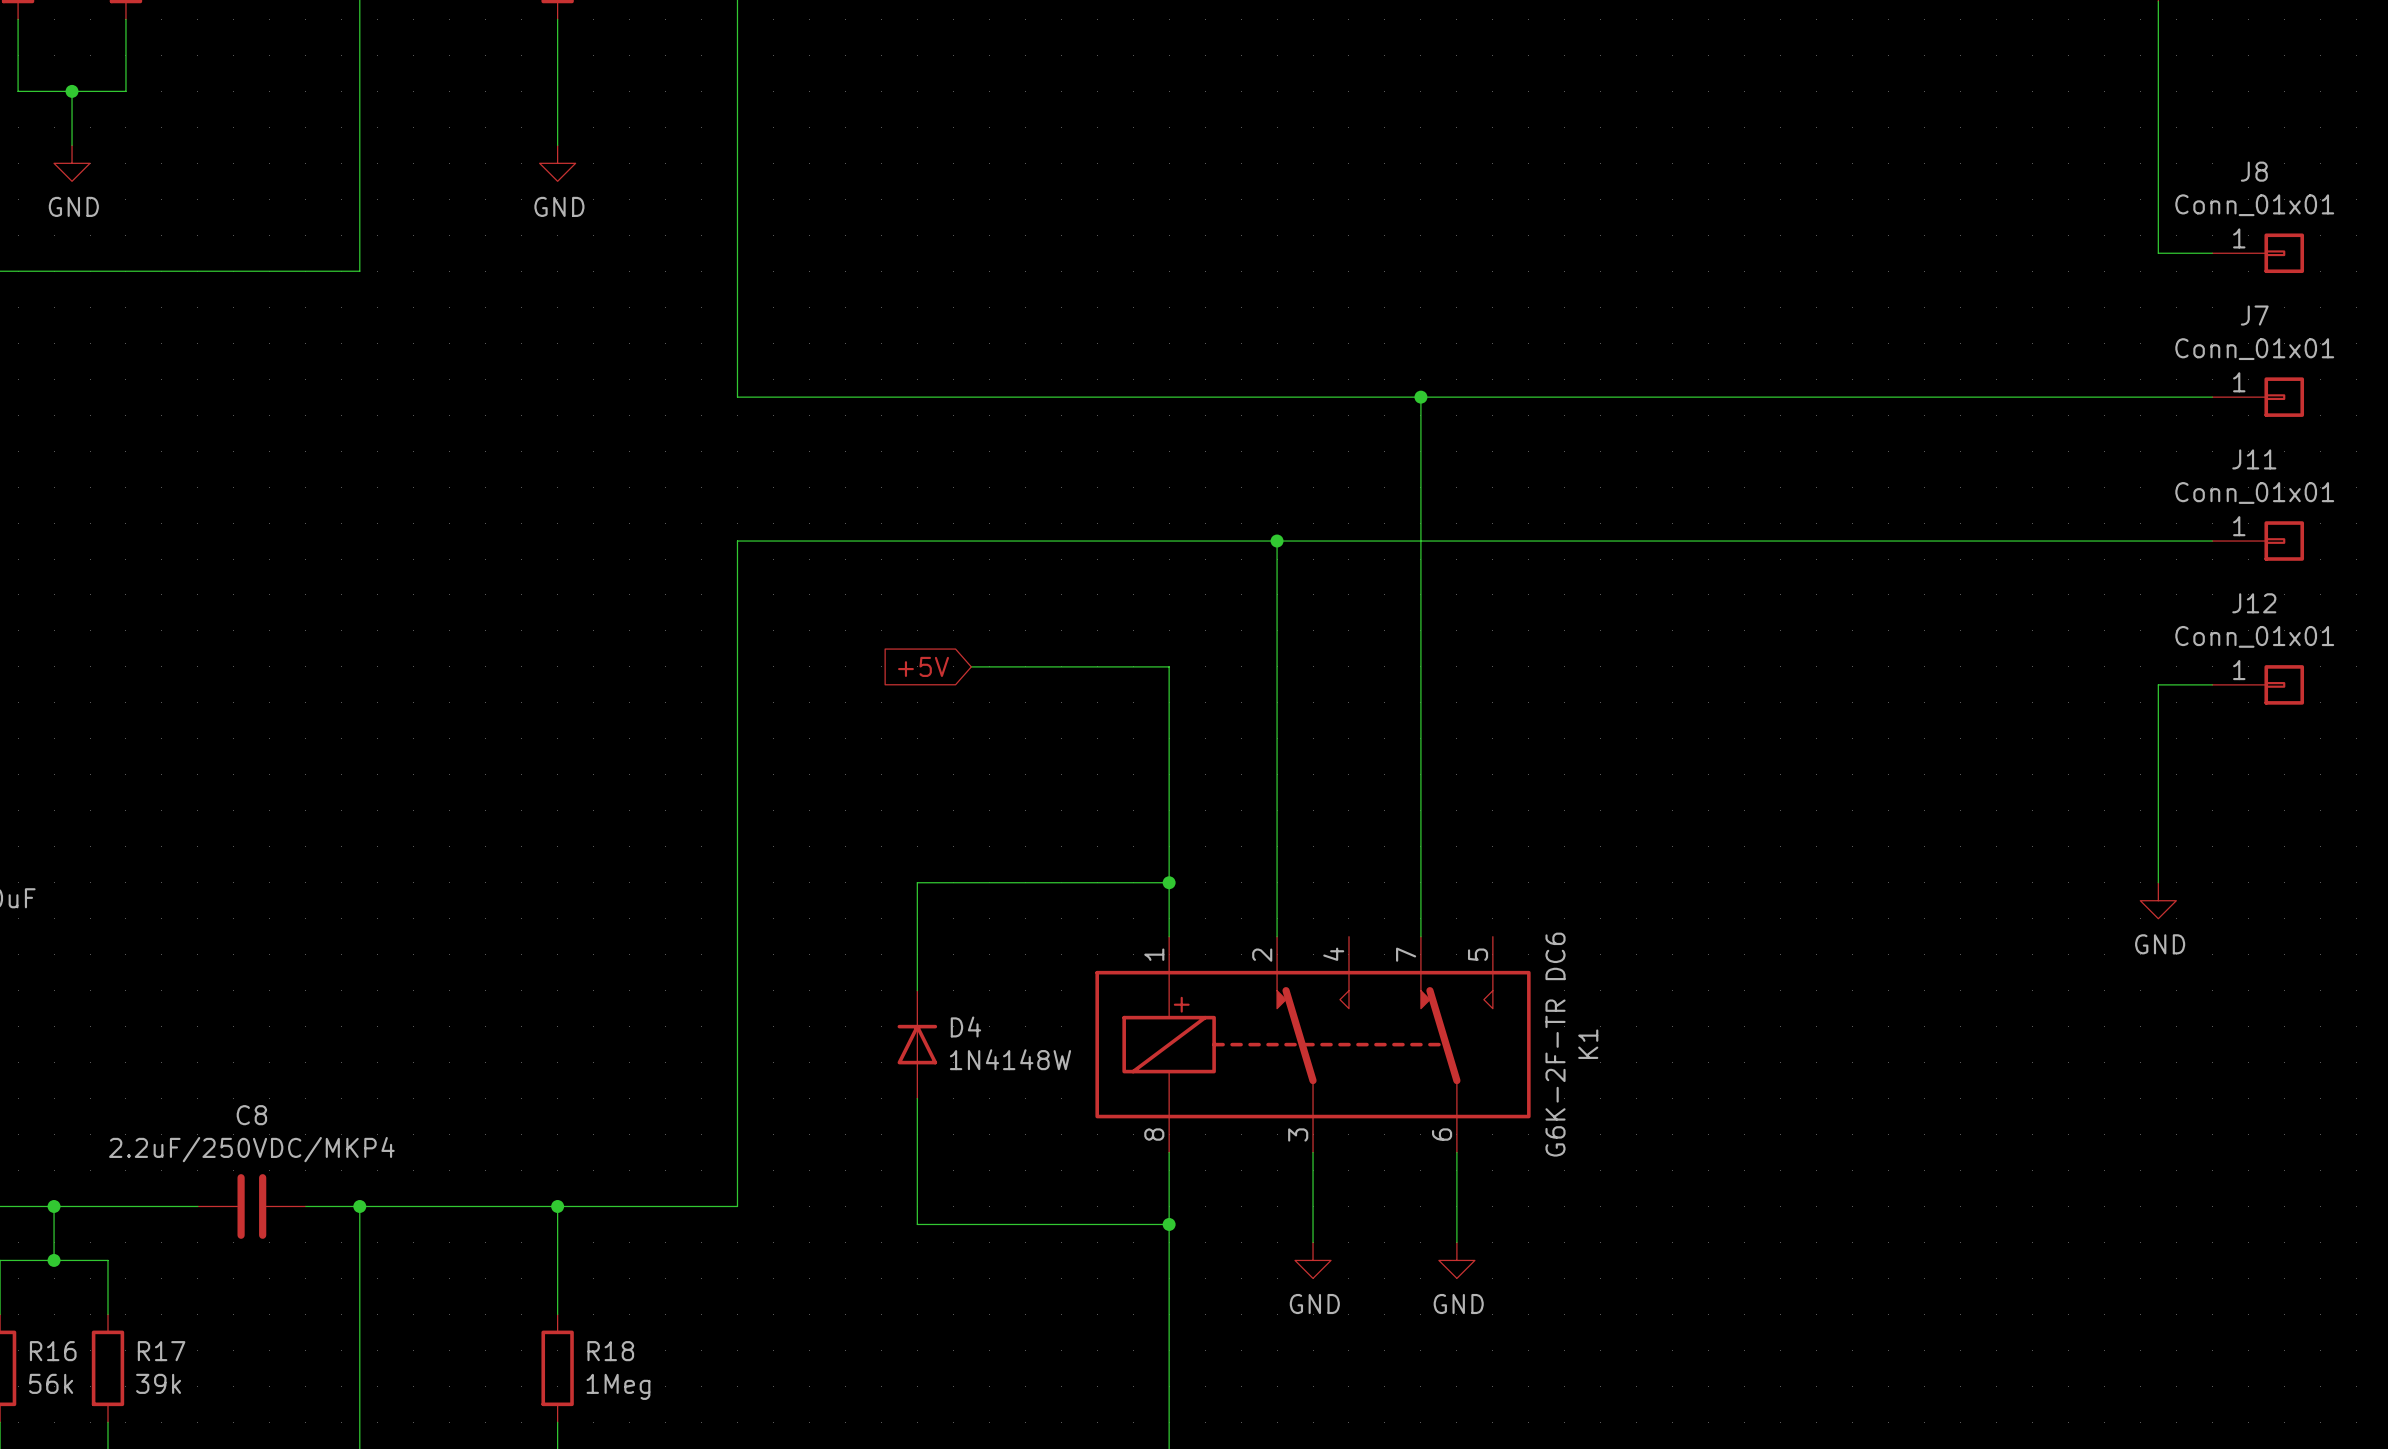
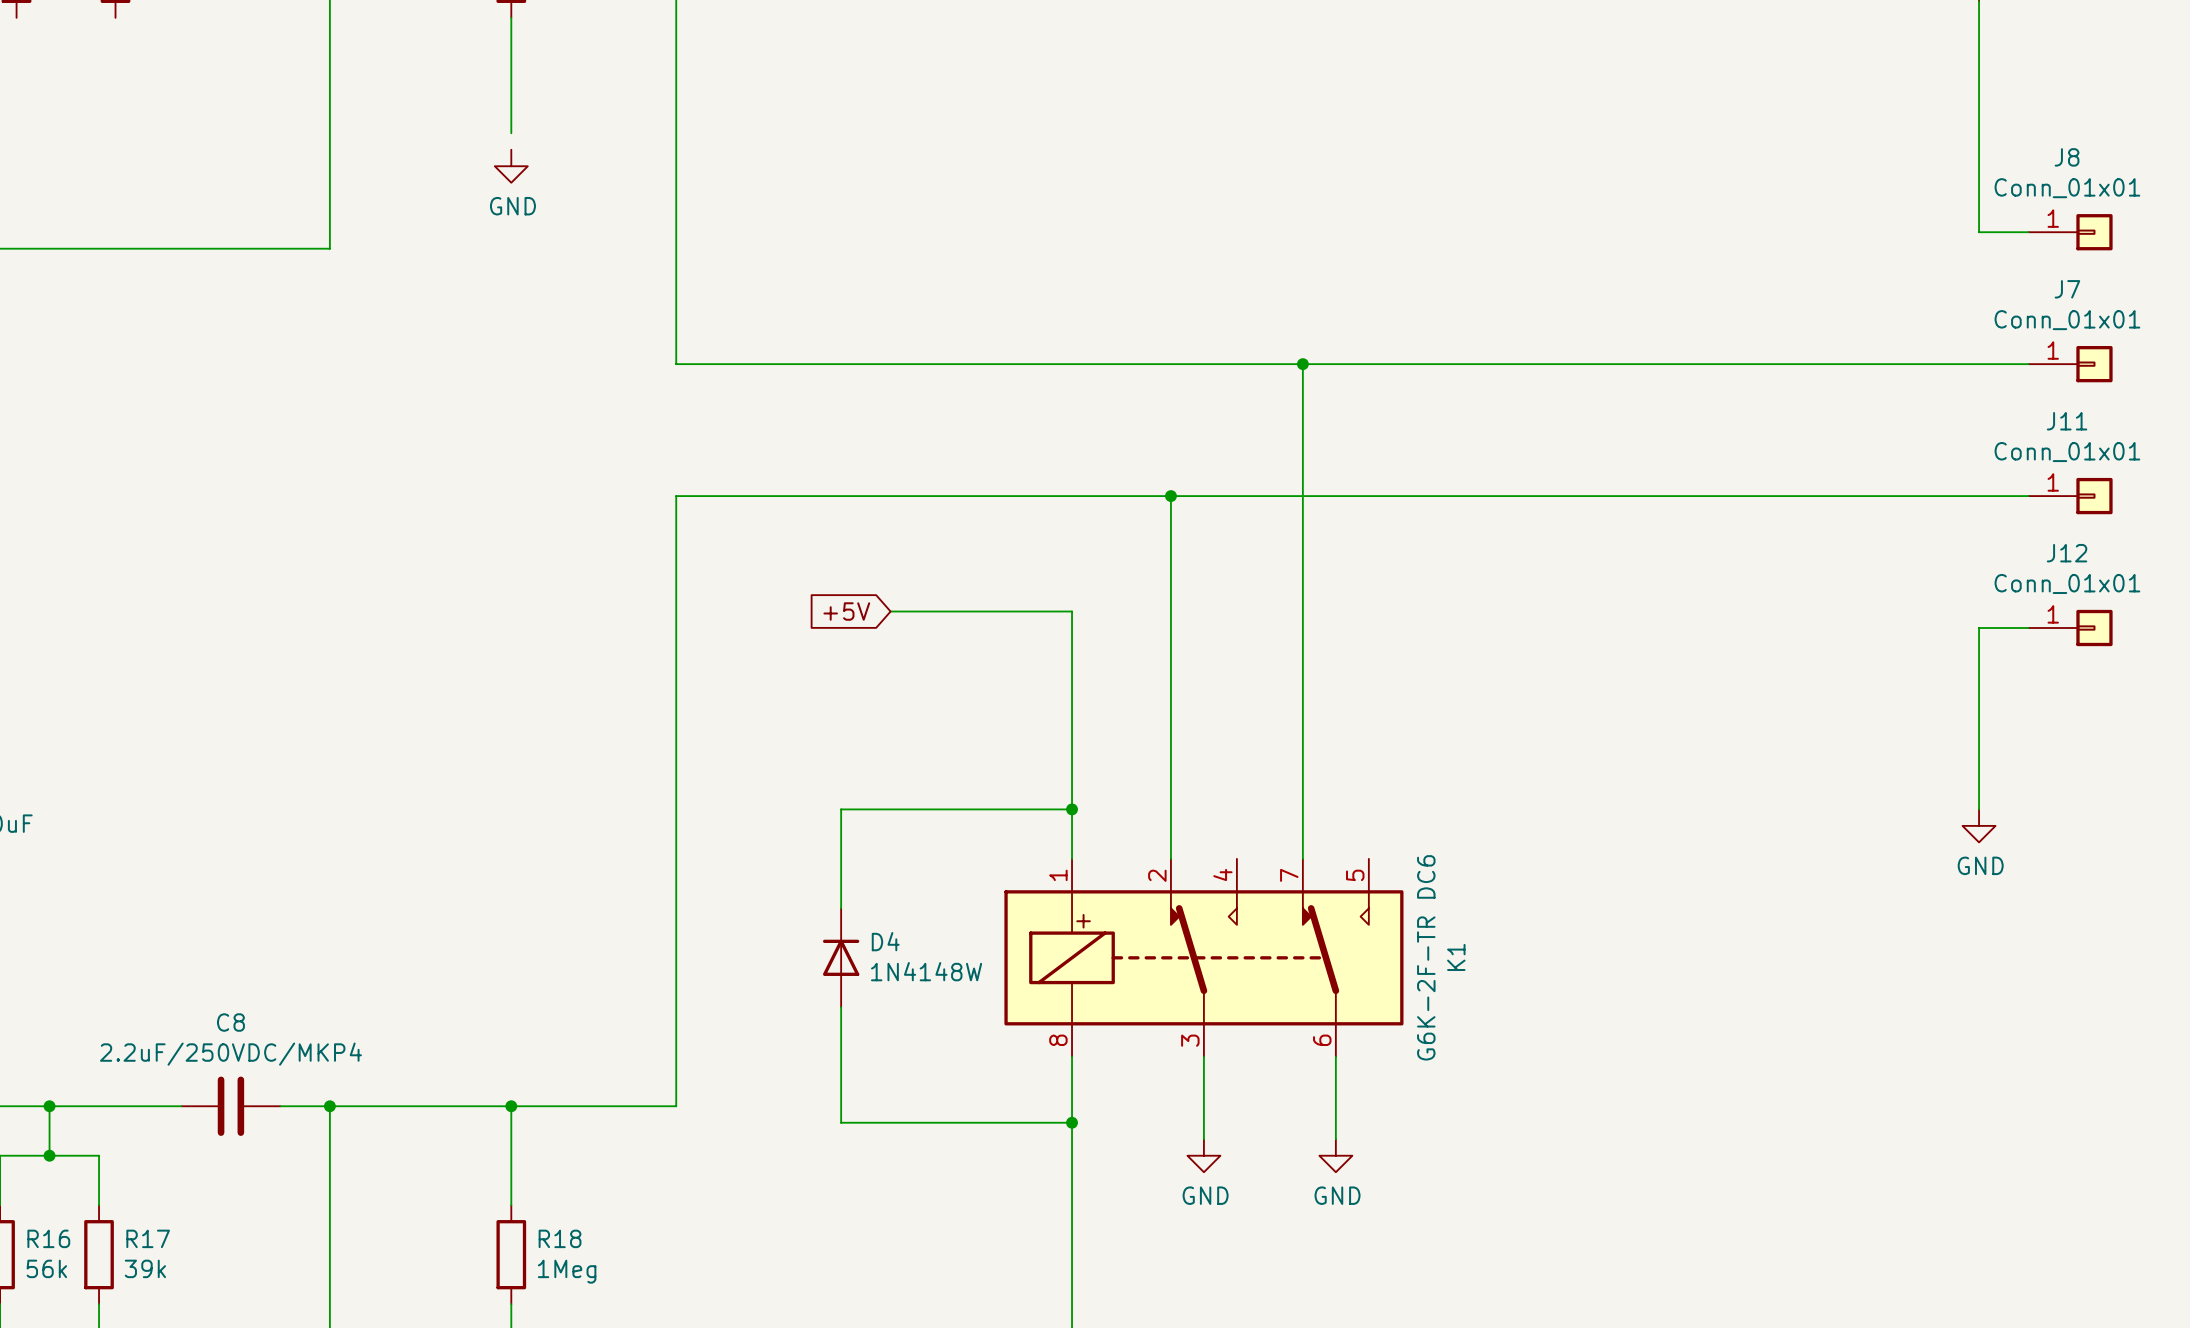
wire: (18, 19) (18, 91) (125, 91) (125, 19) -> none
wire: (72, 91) (72, 145) -> none
junction: (72, 91) -> none
power symbol: GND (72, 163) -> none
power symbol position: GND (557, 163) -> GND (511, 166)

